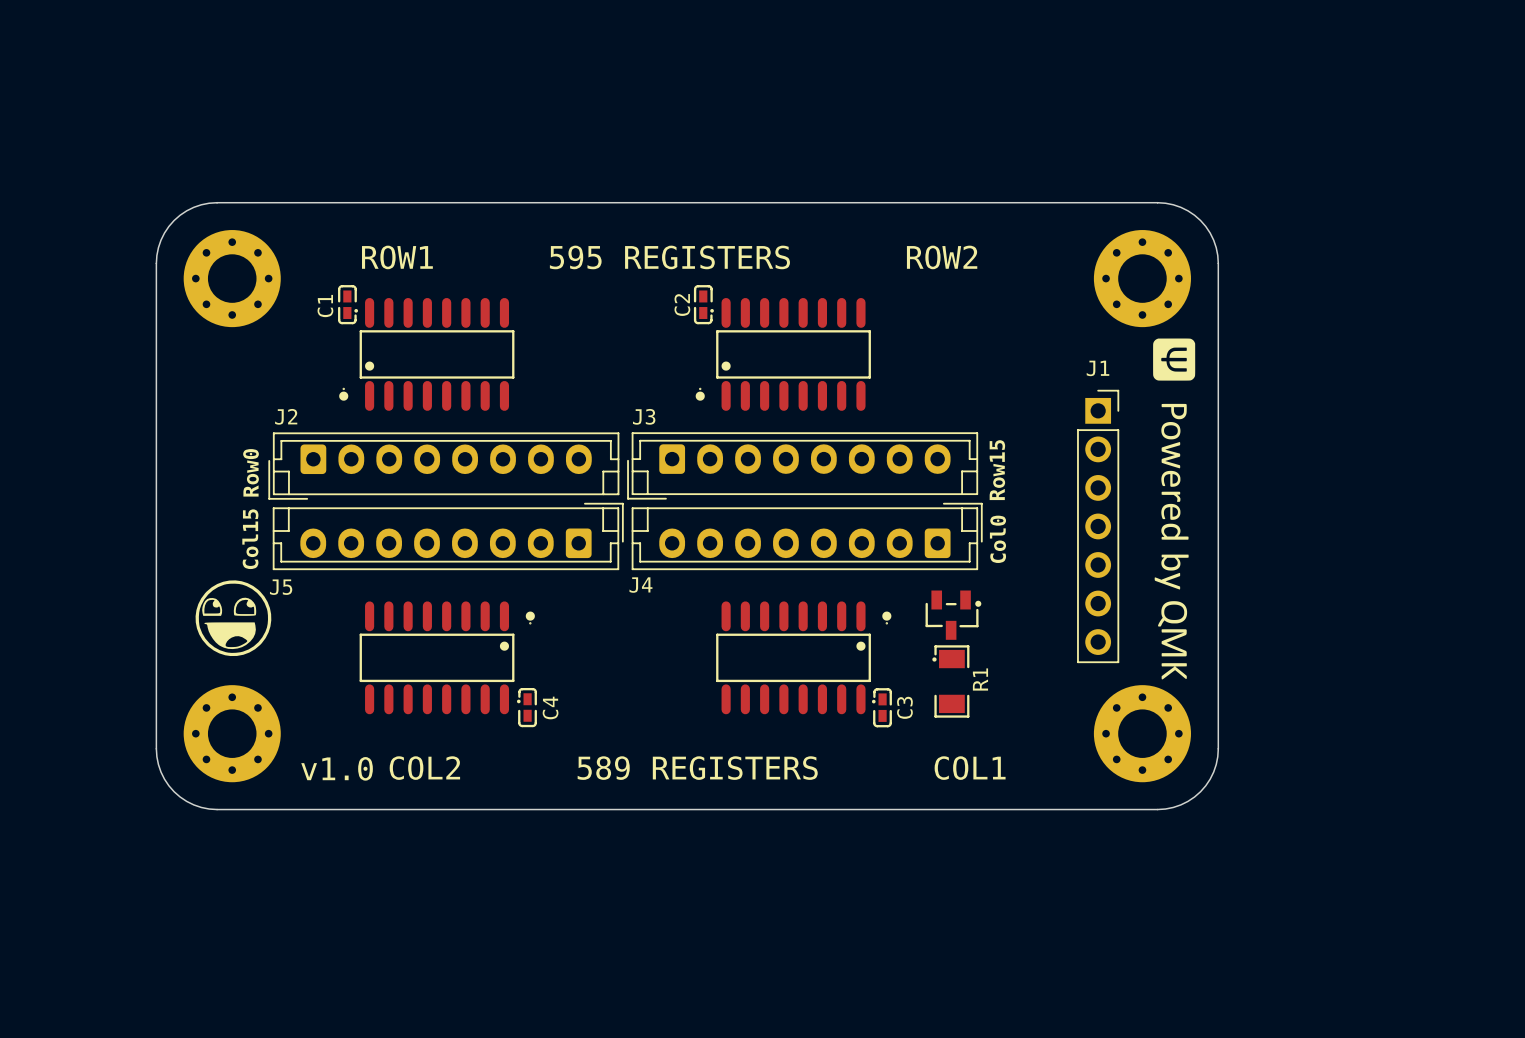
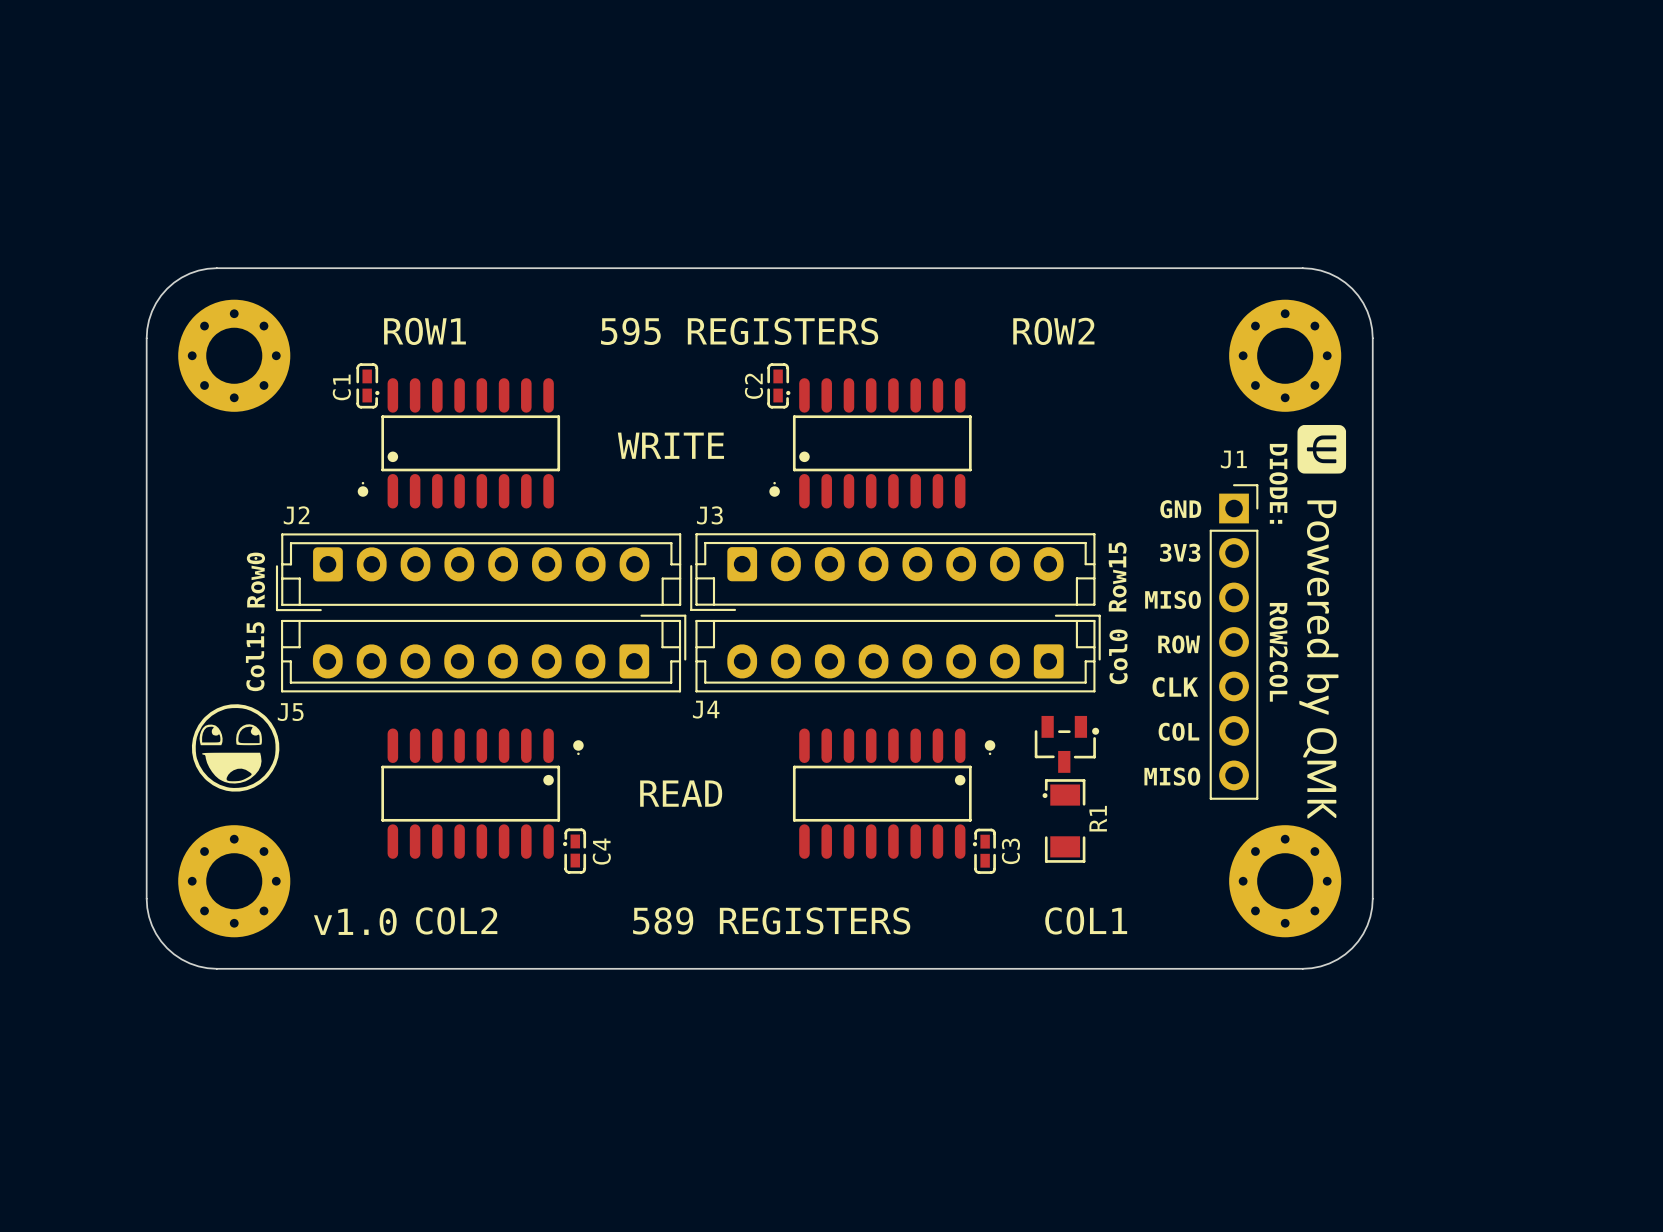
text: none -> WRITE (670, 445)
text: none -> GND (1180, 509)
text: none -> 3V3 (1180, 552)
text: none -> DIODE: ROW2COL (1278, 572)
text: none -> MISO (1173, 599)
text: none -> ROW (1179, 644)
text: none -> CLK (1175, 687)
text: none -> COL (1178, 731)
text: none -> MISO (1172, 776)
text: none -> READ (681, 793)

